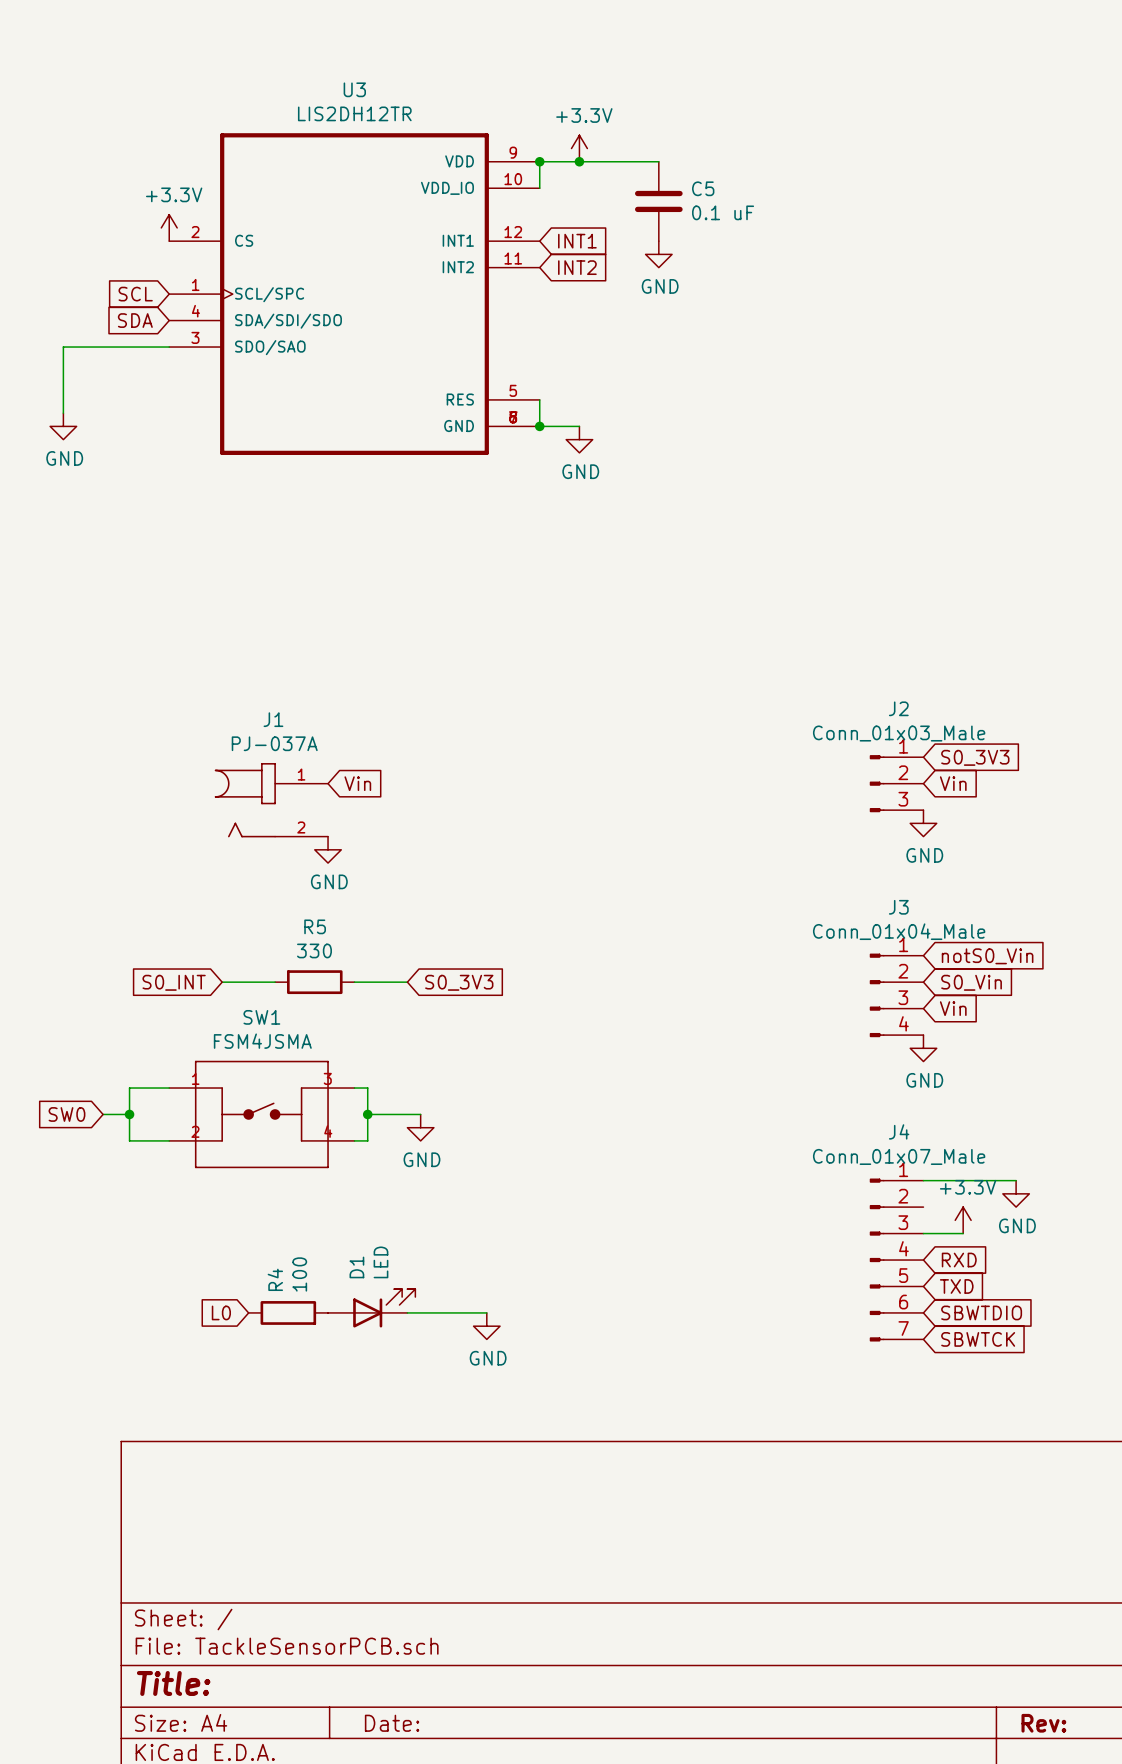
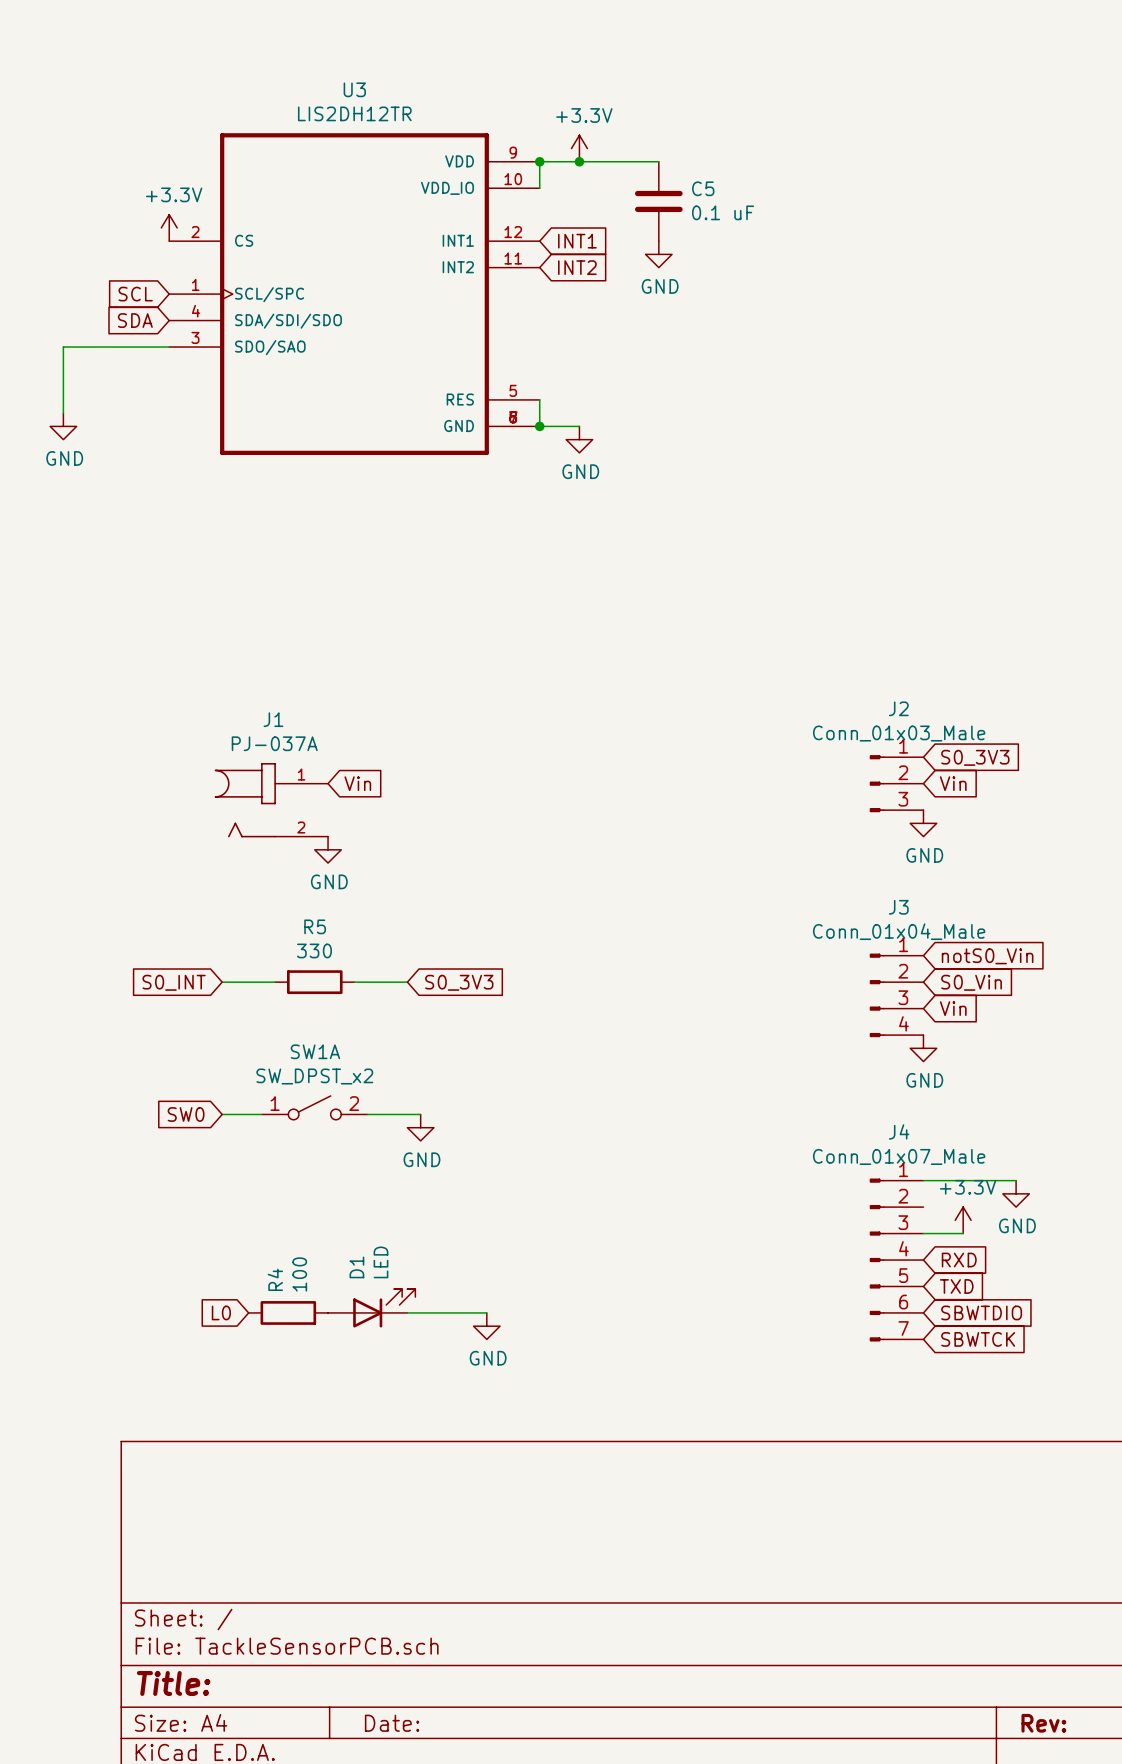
wire: (169, 1088) (129, 1088) (129, 1140) (169, 1140) -> none
wire: (354, 1088) (367, 1088) (367, 1140) (354, 1140) -> none
SW1A: none -> SW_DPST_x2 (314, 1107)
global label position: SW0 (66, 1114) -> SW0 (186, 1114)
wire: (103, 1114) (129, 1114) -> none
junction: (129, 1114) -> none
SW1: FSM4JSMA (261, 1114) -> none
junction: (367, 1114) -> none

